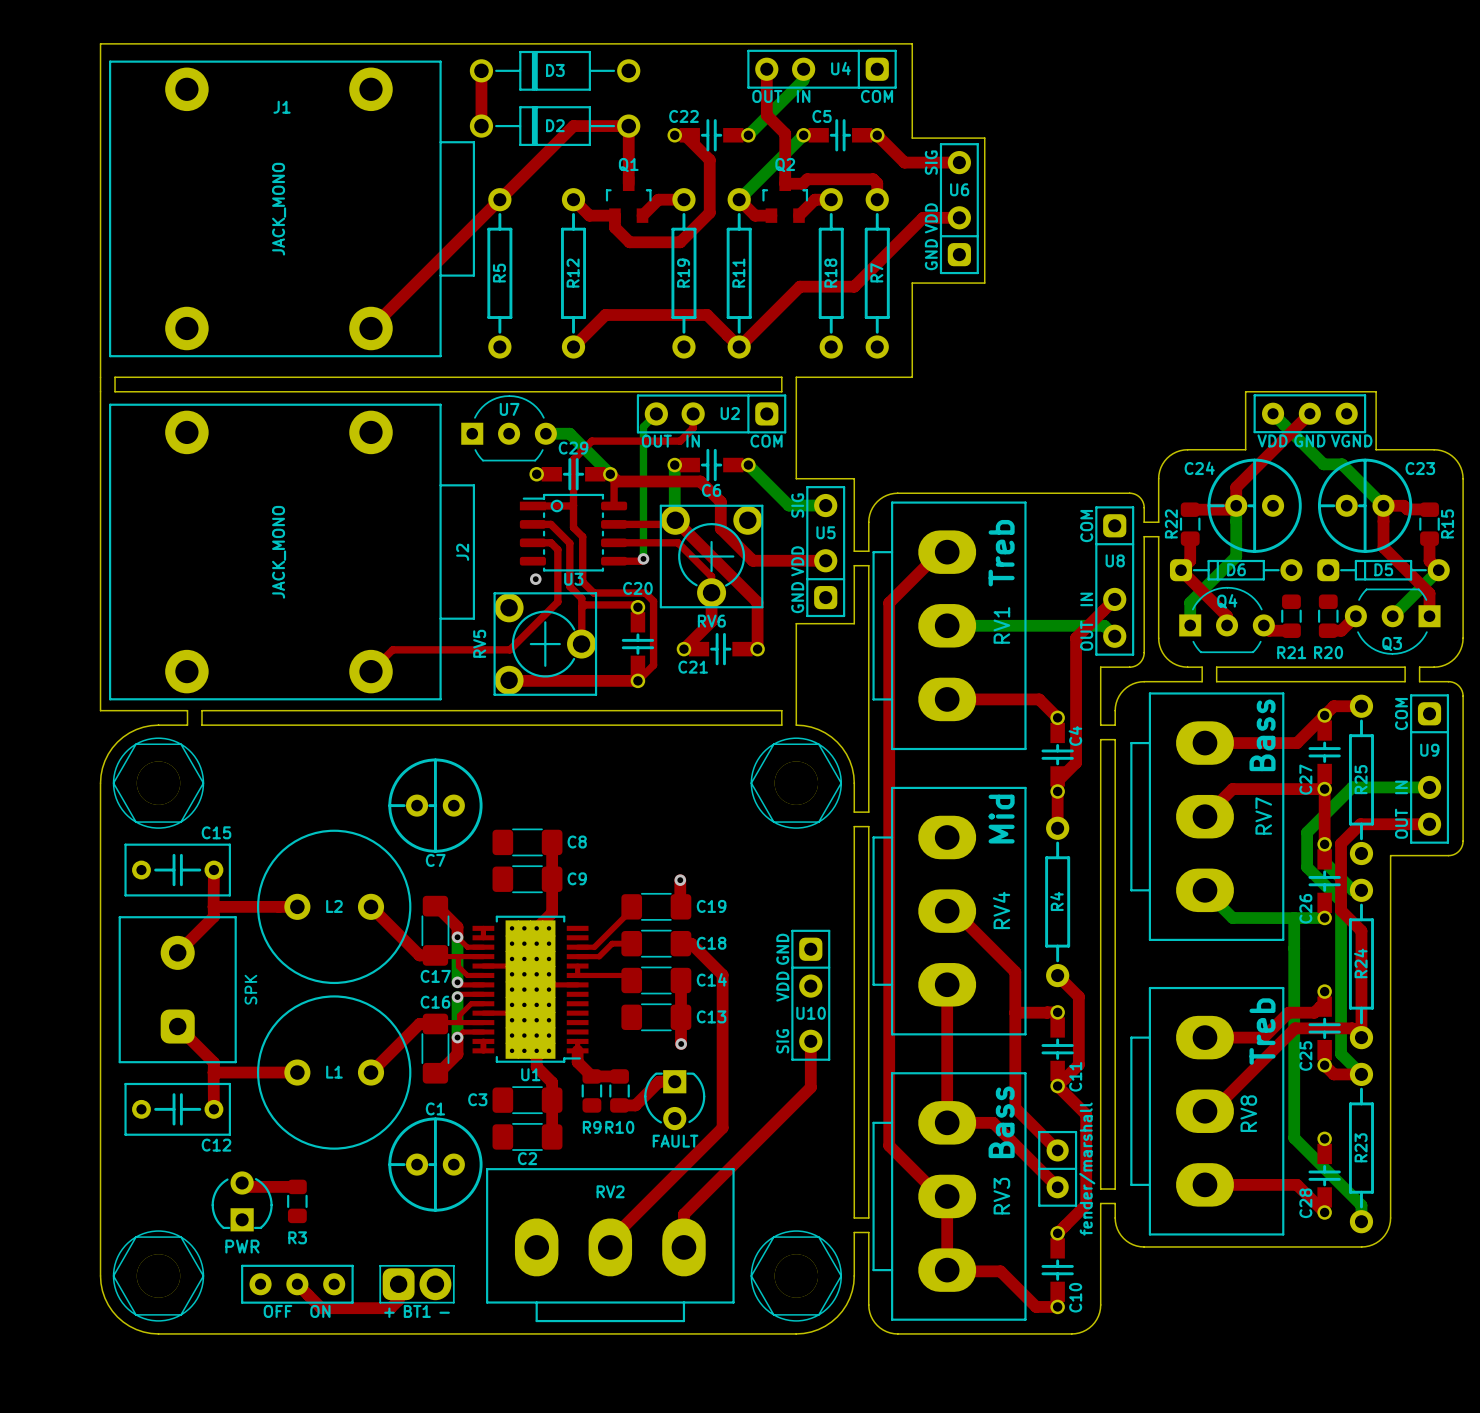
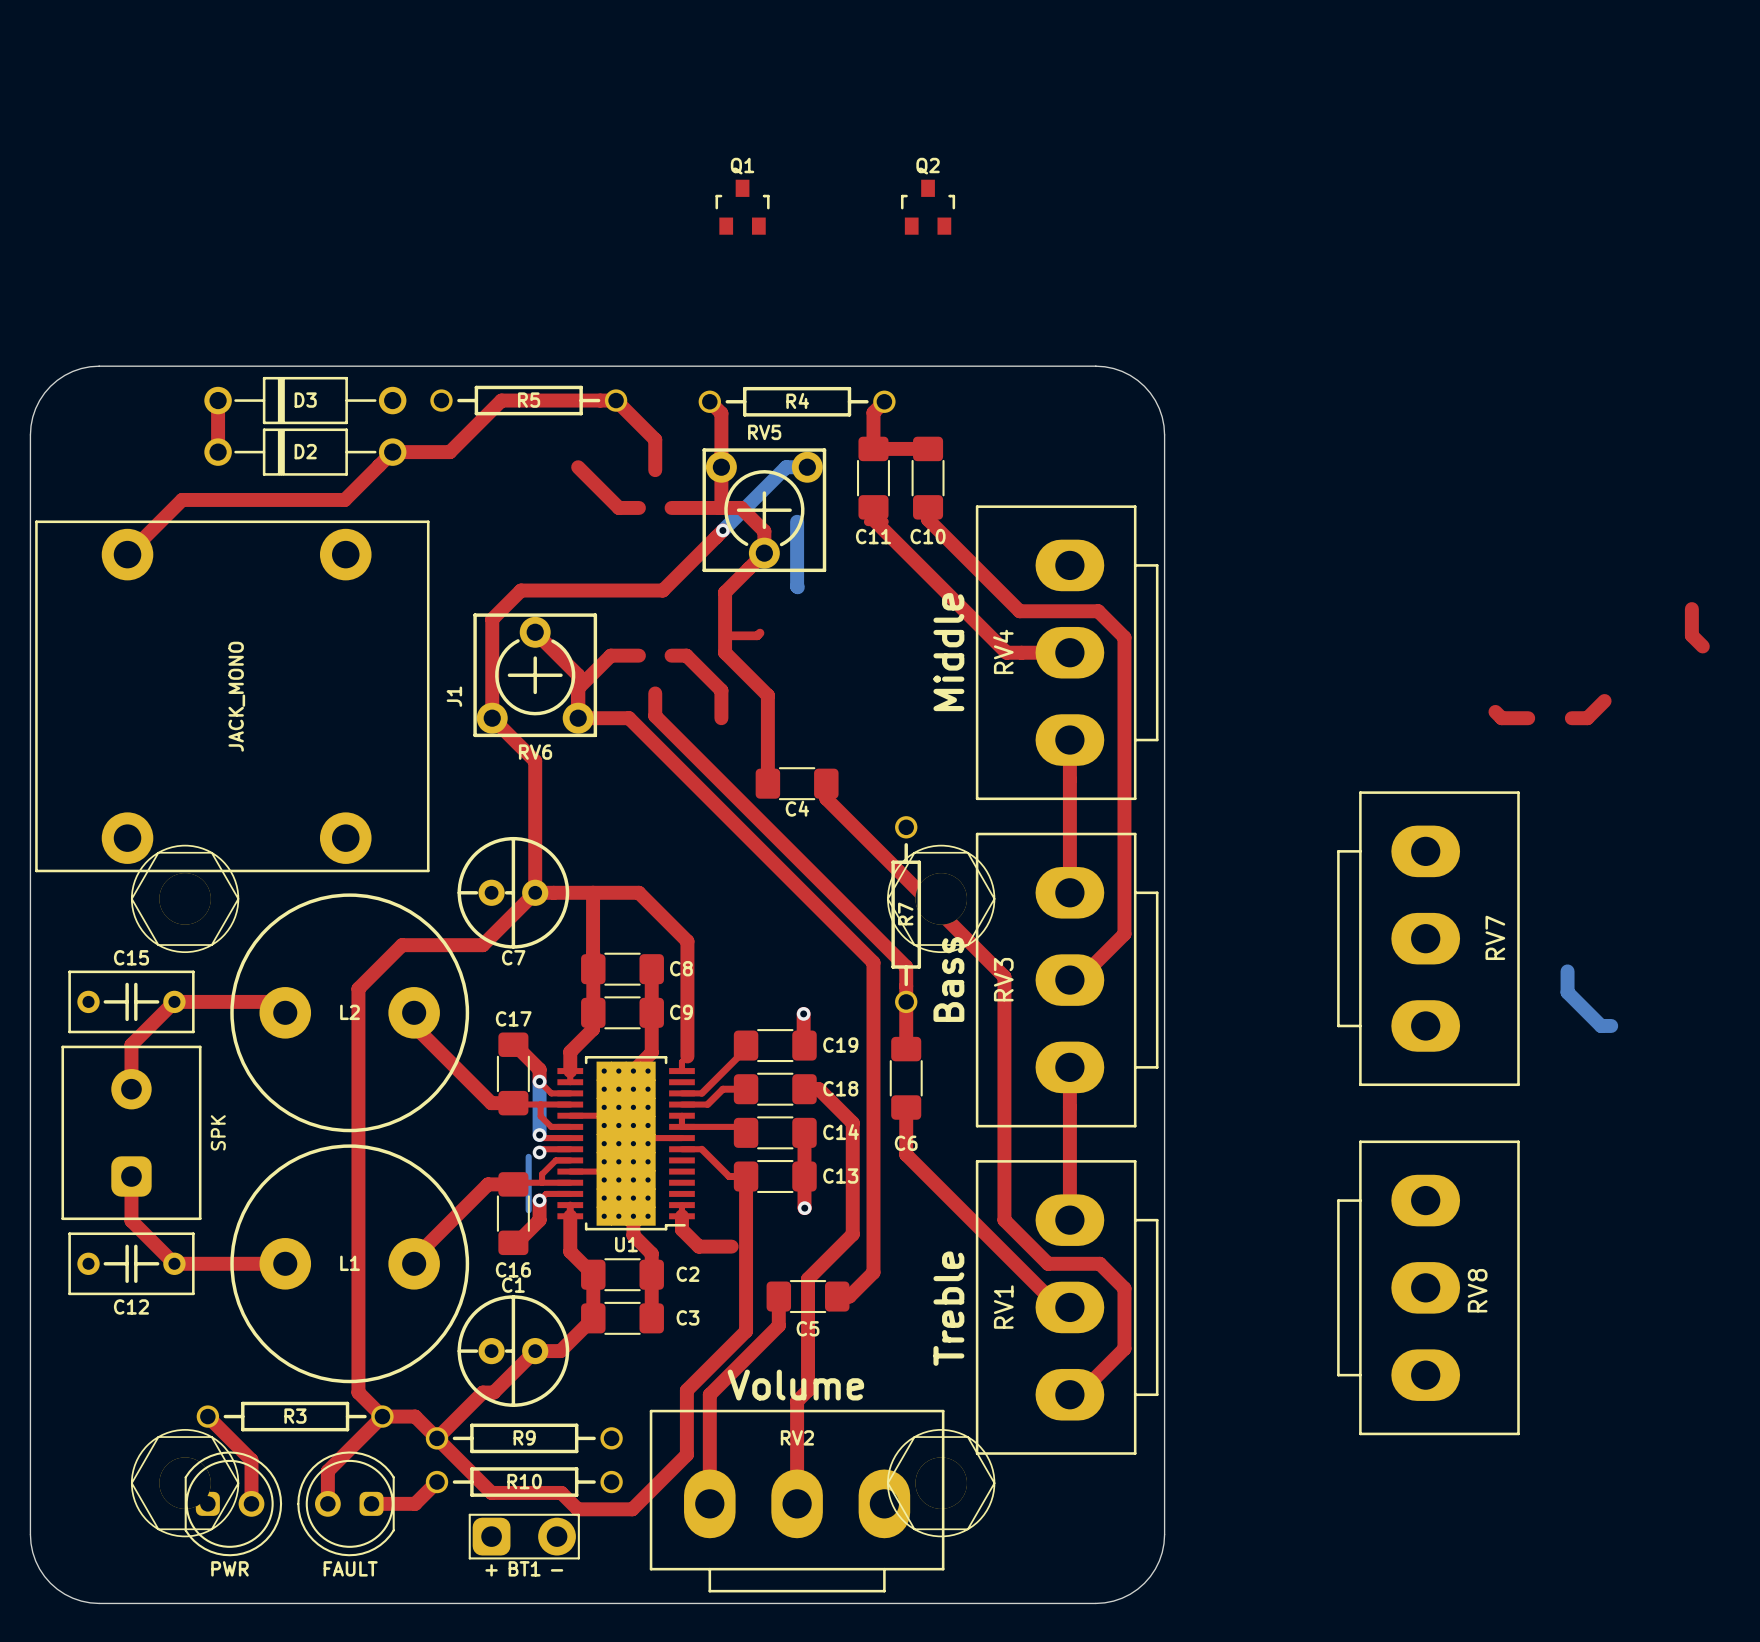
board edge: (100, 43) (100, 710) (187, 710) (187, 725) (150, 725) (136, 729) (123, 737) (108, 754) (101, 775) (100, 1275) (104, 1298) (117, 1316) (136, 1329) (158, 1333) (803, 1333) (818, 1329) (831, 1321) (846, 1304) (853, 1283) (854, 1232) (868, 1232) (869, 1308) (872, 1319) (883, 1330) (897, 1333) (1071, 1333) (1089, 1327) (1099, 1312) (1100, 1203) (1115, 1203) (1115, 1221) (1119, 1232) (1129, 1243) (1140, 1246) (1361, 1246) (1372, 1244) (1382, 1238) (1388, 1229) (1390, 1218) (1390, 855) (1450, 855) (1458, 851) (1462, 843) (1462, 692) (1458, 685) (1452, 682) (1419, 681) (1419, 667) (1437, 666) (1448, 663) (1457, 655) (1462, 641) (1463, 478) (1460, 467) (1454, 458) (1437, 449) (1376, 449) (1376, 391) (1245, 391) (1245, 449) (1183, 449) (1170, 455) (1162, 464) (1158, 474) (1158, 522) (1144, 522) (1143, 502) (1138, 496) (1131, 493) (893, 493) (880, 499) (870, 511) (868, 522) (868, 551) (854, 551) (854, 478) (796, 478) (796, 377) (912, 377) (912, 283) (984, 283) (984, 138) (912, 138) (912, 43) (100, 43) -> none
J1 footprint: [109, 60, 476, 358] -> [35, 520, 430, 873]
top track: (766, 69) (766, 115) (785, 133) (785, 183) (802, 183) (807, 179) (873, 179) (877, 183) (877, 199) -> none
bottom track: (803, 69) (803, 80) (748, 135) (748, 133) -> none
U4: (822, 69) -> none
top track: (481, 70) (481, 126) -> none
D3 position: (555, 70) -> (305, 400)
J1 name position: J1 (282, 107) -> J1 (454, 696)
C5 name position: C5 (822, 116) -> C5 (808, 1328)
C5 footprint: [796, 119, 885, 152] -> [766, 1280, 850, 1314]
D2 position: (555, 126) -> (305, 452)
top track: (674, 135) (685, 135) (709, 160) (709, 212) (680, 242) (629, 242) (614, 227) (614, 215) (589, 215) (573, 199) -> none
C22: (711, 135) -> none
bottom track: (803, 135) (739, 199) -> none
top track: (863, 135) (877, 135) (904, 162) (959, 162) -> none
top track: (628, 183) (628, 126) (573, 126) (371, 328) -> none
R5 footprint: [487, 188, 513, 359] -> [430, 385, 628, 416]
R7 footprint: [864, 188, 890, 359] -> [891, 816, 922, 1014]
top track: (683, 199) (658, 199) (642, 215) -> none
top track: (739, 199) (755, 215) (771, 215) -> none
top track: (831, 199) (814, 199) (798, 215) -> none
U6: (959, 208) -> none
top track: (959, 217) (923, 217) (854, 286) (799, 286) (739, 346) (707, 315) (605, 315) (573, 346) -> none
R12: (573, 273) -> none
R19: (683, 273) -> none
R11: (739, 273) -> none
R18: (831, 273) -> none
board edge: none -> (99, 366) (1095, 366) (1113, 368) (1130, 375) (1150, 393) (1162, 417) (1164, 434) (1164, 1534) (1159, 1561) (1150, 1576) (1137, 1589) (1113, 1601) (1095, 1603) (99, 1603) (72, 1598) (57, 1589) (44, 1576) (35, 1561) (30, 1534) (30, 434) (35, 408) (50, 386) (72, 371) (99, 366)
top track: none -> (218, 400) (218, 452)
top track: none -> (709, 401) (721, 413) (721, 505) (719, 507)
top track: none -> (884, 401) (873, 412) (873, 448) (928, 448)
board edge: (115, 377) (781, 377) (781, 391) (115, 391) (115, 377) -> none
bottom track: (656, 413) (643, 426) (643, 558) -> none
top track: (693, 413) (693, 428) (680, 441) (591, 441) (573, 459) (573, 527) (582, 536) (582, 581) (593, 592) (645, 592) (653, 601) (653, 665) (637, 680) -> none
U2: (711, 413) -> none
bottom track: (1273, 413) (1323, 464) (1342, 464) (1383, 505) -> none
top track: (1309, 413) (1236, 487) (1236, 505) (1232, 509) (1190, 509) -> none
part: (1309, 413) -> none
top track: none -> (578, 467) (618, 507) (638, 507)
bottom track: none -> (807, 467) (786, 467) (722, 530)
top track: none -> (655, 470) (655, 439) (616, 400) (501, 400) (449, 452) (392, 452) (344, 499) (182, 499) (127, 554)
U7: (509, 428) -> none
bottom track: (545, 433) (569, 433) (610, 474) -> none
text: VDD (1272, 440) -> none
text: GND (1309, 440) -> none
text: VGND (1351, 440) -> none
C6 footprint: [667, 448, 756, 482] -> [889, 1036, 923, 1120]
top track: none -> (873, 507) (873, 519) (1006, 652) (1069, 652)
top track: none -> (928, 507) (928, 519) (1019, 611) (1098, 611) (1124, 637) (1124, 934) (1078, 980) (1069, 980)
top track: none -> (671, 507) (741, 507) (764, 531) (764, 553) (725, 592) (725, 652) (767, 695) (767, 783)
bottom track: (748, 465) (788, 505) (825, 505) -> none
top track: none -> (722, 530) (662, 590) (521, 590) (492, 619) (492, 718) (535, 761) (535, 892)
via: none -> (722, 530)
C29: (573, 474) -> none
top track: (610, 474) (617, 481) (700, 481) (720, 501) (720, 528) (752, 560) (825, 560) -> none
top track: (610, 474) (614, 478) (614, 505) -> none
C6 name position: C6 (711, 490) -> C6 (906, 1143)
RV6 footprint: [659, 504, 764, 609] -> [473, 613, 598, 738]
top track: (573, 505) (532, 505) -> none
bottom track: (1236, 505) (1236, 556) (1190, 602) (1190, 625) -> none
C24: (1254, 505) -> none
C23: (1365, 505) -> none
top track: (1429, 509) (1407, 509) (1403, 505) (1383, 505) (1383, 547) (1429, 593) (1429, 616) -> none
top track: (532, 524) (550, 524) (569, 543) (569, 586) (581, 598) (581, 644) -> none
top track: (614, 524) (671, 524) (675, 520) (757, 602) (757, 649) (743, 649) -> none
R22: (1190, 524) -> none
R15: (1429, 524) -> none
U3: (573, 532) -> none
board edge: (1144, 536) (1143, 656) (1139, 662) (1133, 666) (1100, 667) (1100, 725) (1115, 725) (1117, 699) (1123, 690) (1133, 683) (1144, 681) (1202, 681) (1202, 667) (1176, 664) (1167, 658) (1160, 649) (1158, 638) (1158, 536) (1144, 536) -> none
top track: (1190, 538) (1190, 561) (1181, 570) (1227, 616) (1227, 625) -> none
top track: (532, 542) (550, 542) (557, 549) (557, 601) (509, 649) (392, 649) (371, 671) -> none
top track: (614, 542) (677, 542) (711, 576) (711, 621) (683, 649) (697, 649) -> none
U5: (825, 551) -> none
J2: JACK_MONO (292, 552) -> none
top track: (947, 552) (939, 552) (889, 602) (889, 1145) (939, 1196) (947, 1196) (948, 1271) (1000, 1271) (1036, 1306) (1057, 1306) (1057, 1293) -> none
text: Treb (1001, 553) -> none
top track: none -> (535, 632) (578, 675) (578, 718) (629, 718) (873, 962) (873, 1272) (849, 1296) (837, 1296)
via: (643, 558) -> none
board edge: (854, 565) (854, 623) (796, 623) (796, 725) (818, 729) (831, 737) (842, 747) (849, 760) (853, 775) (854, 812) (868, 812) (868, 565) (854, 565) -> none
D6: (1236, 570) -> none
D5: (1383, 570) -> none
bottom track: (1438, 570) (1392, 616) -> none
text: none -> Middle (948, 652)
top track: none -> (638, 655) (610, 655) (578, 688)
top track: none -> (671, 655) (686, 655) (721, 690) (721, 718)
via: (535, 579) -> none
U8: (1114, 581) -> none
RV5 footprint: [493, 592, 598, 696] -> [702, 448, 827, 573]
top track: (1114, 599) (1076, 638) (1076, 762) (1057, 781) (1057, 828) -> none
top track: (581, 607) (584, 604) (635, 604) (637, 607) (637, 620) -> none
top track: none -> (655, 693) (655, 716) (906, 966) (906, 1049)
R21: (1291, 616) -> none
R20: (1328, 616) -> none
Q4: (1227, 619) -> none
Q3: (1392, 621) -> none
bottom track: (947, 625) (1104, 625) (1114, 636) -> none
RV1 rotation: 0° (949, 625) -> 180° (1067, 1307)
RV1 position: (949, 625) -> (1067, 1307)
RV5 name position: RV5 (479, 643) -> RV5 (764, 432)
C20: (637, 644) -> none
C21: (720, 649) -> none
top track: none -> (1069, 740) (1069, 892)
board edge: (1216, 667) (1405, 667) (1405, 681) (1216, 681) (1216, 667) -> none
top track: (509, 680) (637, 680) -> none
top track: none -> (826, 783) (826, 798) (1004, 976) (1004, 1220) (1048, 1263) (1099, 1263) (1124, 1288) (1124, 1348) (1078, 1394) (1069, 1394)
top track: (947, 699) (1039, 699) (1057, 717) (1057, 731) -> none
top track: (1361, 706) (1333, 706) (1297, 743) (1204, 743) -> none
board edge: (201, 710) (781, 710) (781, 725) (201, 725) (201, 710) -> none
C4 footprint: [1041, 710, 1074, 799] -> [755, 767, 839, 801]
C4 name position: C4 (1075, 735) -> C4 (797, 808)
text: Bass (1262, 735) -> none
board edge: (1100, 739) (1100, 1189) (1115, 1189) (1115, 739) (1100, 739) -> none
C27: (1324, 752) -> none
U9: (1429, 769) -> none
top track: none -> (535, 892) (482, 945) (402, 945) (358, 988) (358, 1392) (382, 1416)
top track: none -> (535, 892) (638, 892) (687, 941) (687, 1056) (681, 1061) (681, 1071)
top track: none -> (593, 892) (593, 1029) (570, 1051) (570, 1071)
R25: (1361, 779) -> none
bottom track: (1429, 787) (1352, 787) (1307, 832) (1307, 867) (1341, 901) (1341, 1053) (1361, 1074) -> none
top track: (1324, 789) (1324, 857) -> none
top track: (1324, 789) (1232, 789) (1204, 816) -> none
C7 position: (435, 805) -> (513, 892)
R4 footprint: [1045, 816, 1071, 988] -> [698, 386, 896, 417]
text: Mid (1001, 819) -> none
top track: (1429, 824) (1360, 824) (1341, 843) (1341, 910) (1361, 930) (1361, 1037) (1352, 1028) (1295, 1028) (1212, 1111) (1204, 1111) -> none
board edge: (854, 826) (854, 1218) (868, 1218) (868, 826) (854, 826) -> none
L2 footprint: [257, 829, 412, 985] -> [230, 893, 470, 1133]
C15 name position: C15 (216, 832) -> C15 (131, 957)
text: none -> Bass (948, 979)
C15 position: (177, 870) -> (131, 1001)
top track: (213, 870) (213, 906) -> none
top track: none -> (285, 1012) (290, 1012) (279, 1001) (174, 1001) (131, 1044) (131, 1089)
C26: (1324, 881) -> none
bottom track: (1204, 890) (1232, 917) (1294, 918) -> none
top track: (213, 906) (297, 906) -> none
top track: (213, 906) (213, 916) (177, 952) -> none
top track: (371, 906) (419, 955) -> (414, 1012) (414, 1025) (491, 1103) (494, 1103)
top track: (947, 911) (954, 911) (1015, 972) (1015, 1108) (1057, 1150) -> none
RV4 rotation: 0° (949, 911) -> 180° (1067, 652)
RV4 position: (949, 911) -> (1067, 652)
bottom track: (1324, 917) (1294, 918) -> none
bottom track: (1294, 918) (1294, 1138) (1361, 1205) (1361, 1221) -> none
top track: none -> (1069, 1067) (1069, 1220)
top track: (691, 943) (722, 974) (722, 1127) (610, 1240) (610, 1247) -> (816, 1089) (852, 1123) (852, 1234) (808, 1279) (808, 1390) (797, 1401) (797, 1503)
top track: none -> (906, 1107) (906, 1154) (1058, 1307) (1069, 1307)
R24: (1361, 963) -> none
top track: (1057, 975) (1078, 996) (1078, 1064) (1057, 1086) -> none
C17 name position: C17 (435, 976) -> C17 (513, 1018)
top track: (947, 984) (947, 1122) (993, 1122) (1057, 1187) -> none
part position: (177, 989) -> (131, 1132)
top track: none -> (681, 1149) (701, 1149) (729, 1176) (746, 1176) (746, 1331) (686, 1390) (686, 1454) (632, 1509) (577, 1509) (561, 1492) (491, 1492) (415, 1416) (382, 1416)
L1 footprint: [257, 995, 412, 1150] -> [230, 1144, 470, 1384]
U10: (810, 995) -> none
bottom track: (457, 997) (457, 1037) -> none
bottom track: none -> (528, 1156) (528, 1210)
C16 name position: C16 (435, 1002) -> C16 (513, 1269)
C11 footprint: [1041, 1005, 1074, 1094] -> [856, 436, 890, 520]
top track: (1324, 1005) (1324, 991) (1324, 1006) (1320, 1006) (1314, 1012) (1288, 1012) (1263, 1037) (1204, 1037) -> none
top track: (1015, 1012) (1057, 1012) (1057, 1026) -> none
top track: none -> (131, 1176) (131, 1220) (174, 1263) (285, 1263)
top track: (419, 1023) (371, 1072) -> (494, 1184) (488, 1184) (414, 1258) (414, 1263)
top track: (177, 1026) (213, 1062) (213, 1072) -> none
C25: (1324, 1028) -> none
text: Treb (1262, 1031) -> none
top track: (810, 1041) (810, 1087) (683, 1214) (683, 1247) -> none
top track: none -> (570, 1216) (570, 1251) (593, 1274) (593, 1318) (560, 1351) (535, 1351) (493, 1392) (482, 1392) (437, 1438)
top track: (1324, 1051) (1324, 1065) (1333, 1074) (1361, 1074) -> none
R9 footprint: [581, 1069, 603, 1113] -> [425, 1423, 623, 1454]
R10 footprint: [609, 1069, 630, 1113] -> [425, 1467, 623, 1497]
top track: (213, 1072) (297, 1072) -> none
top track: (213, 1072) (213, 1109) -> none
top track: (674, 1081) (659, 1081) (635, 1105) (619, 1105) -> none
top track: (1057, 1086) (1086, 1114) (1086, 1204) (1057, 1233) (1057, 1246) -> none
C3 name: C3 (477, 1099) -> C2 (687, 1274)
part: FAULT (674, 1100) -> none
C12 position: (177, 1109) -> (131, 1263)
top track: none -> (778, 1296) (778, 1325) (709, 1394) (709, 1503)
text: Bass (1001, 1122) -> none
R9 name position: R9 (592, 1127) -> R9 (524, 1437)
R10 name position: R10 (619, 1127) -> R10 (524, 1481)
text: none -> Treble (948, 1308)
C12 name position: C12 (216, 1145) -> C12 (131, 1306)
R23: (1361, 1148) -> none
C2 name: C2 (527, 1158) -> C3 (687, 1317)
part: fender/marshall (1057, 1168) -> none
C28: (1324, 1175) -> none
R3 footprint: [287, 1179, 308, 1224] -> [196, 1401, 394, 1432]
top track: (242, 1182) (246, 1186) (297, 1186) -> none
top track: (1204, 1184) (1297, 1184) (1324, 1212) (1324, 1198) -> none
text: none -> Volume (795, 1385)
RV3 rotation: 0° (949, 1196) -> 180° (1067, 980)
RV3 position: (949, 1196) -> (1067, 980)
part: PWR (242, 1201) -> none
top track: none -> (207, 1416) (251, 1460) (251, 1503)
top track: none -> (382, 1416) (327, 1471) (327, 1503)
C10 footprint: [1041, 1226, 1074, 1315] -> [911, 436, 945, 520]
R3 name position: R3 (297, 1237) -> R3 (295, 1416)
RV2 position: (610, 1245) -> (797, 1501)
part footprint: [241, 1264, 354, 1304] -> [297, 1451, 395, 1557]
BT1 footprint: [379, 1264, 455, 1304] -> [468, 1513, 580, 1560]
top track: none -> (437, 1482) (415, 1503) (371, 1503)
top track: (297, 1284) (321, 1308) (390, 1308) (398, 1300) (398, 1284) -> none
part: none -> PWR (233, 1503)
part value: OFF ON (297, 1311) -> FAULT (350, 1568)

